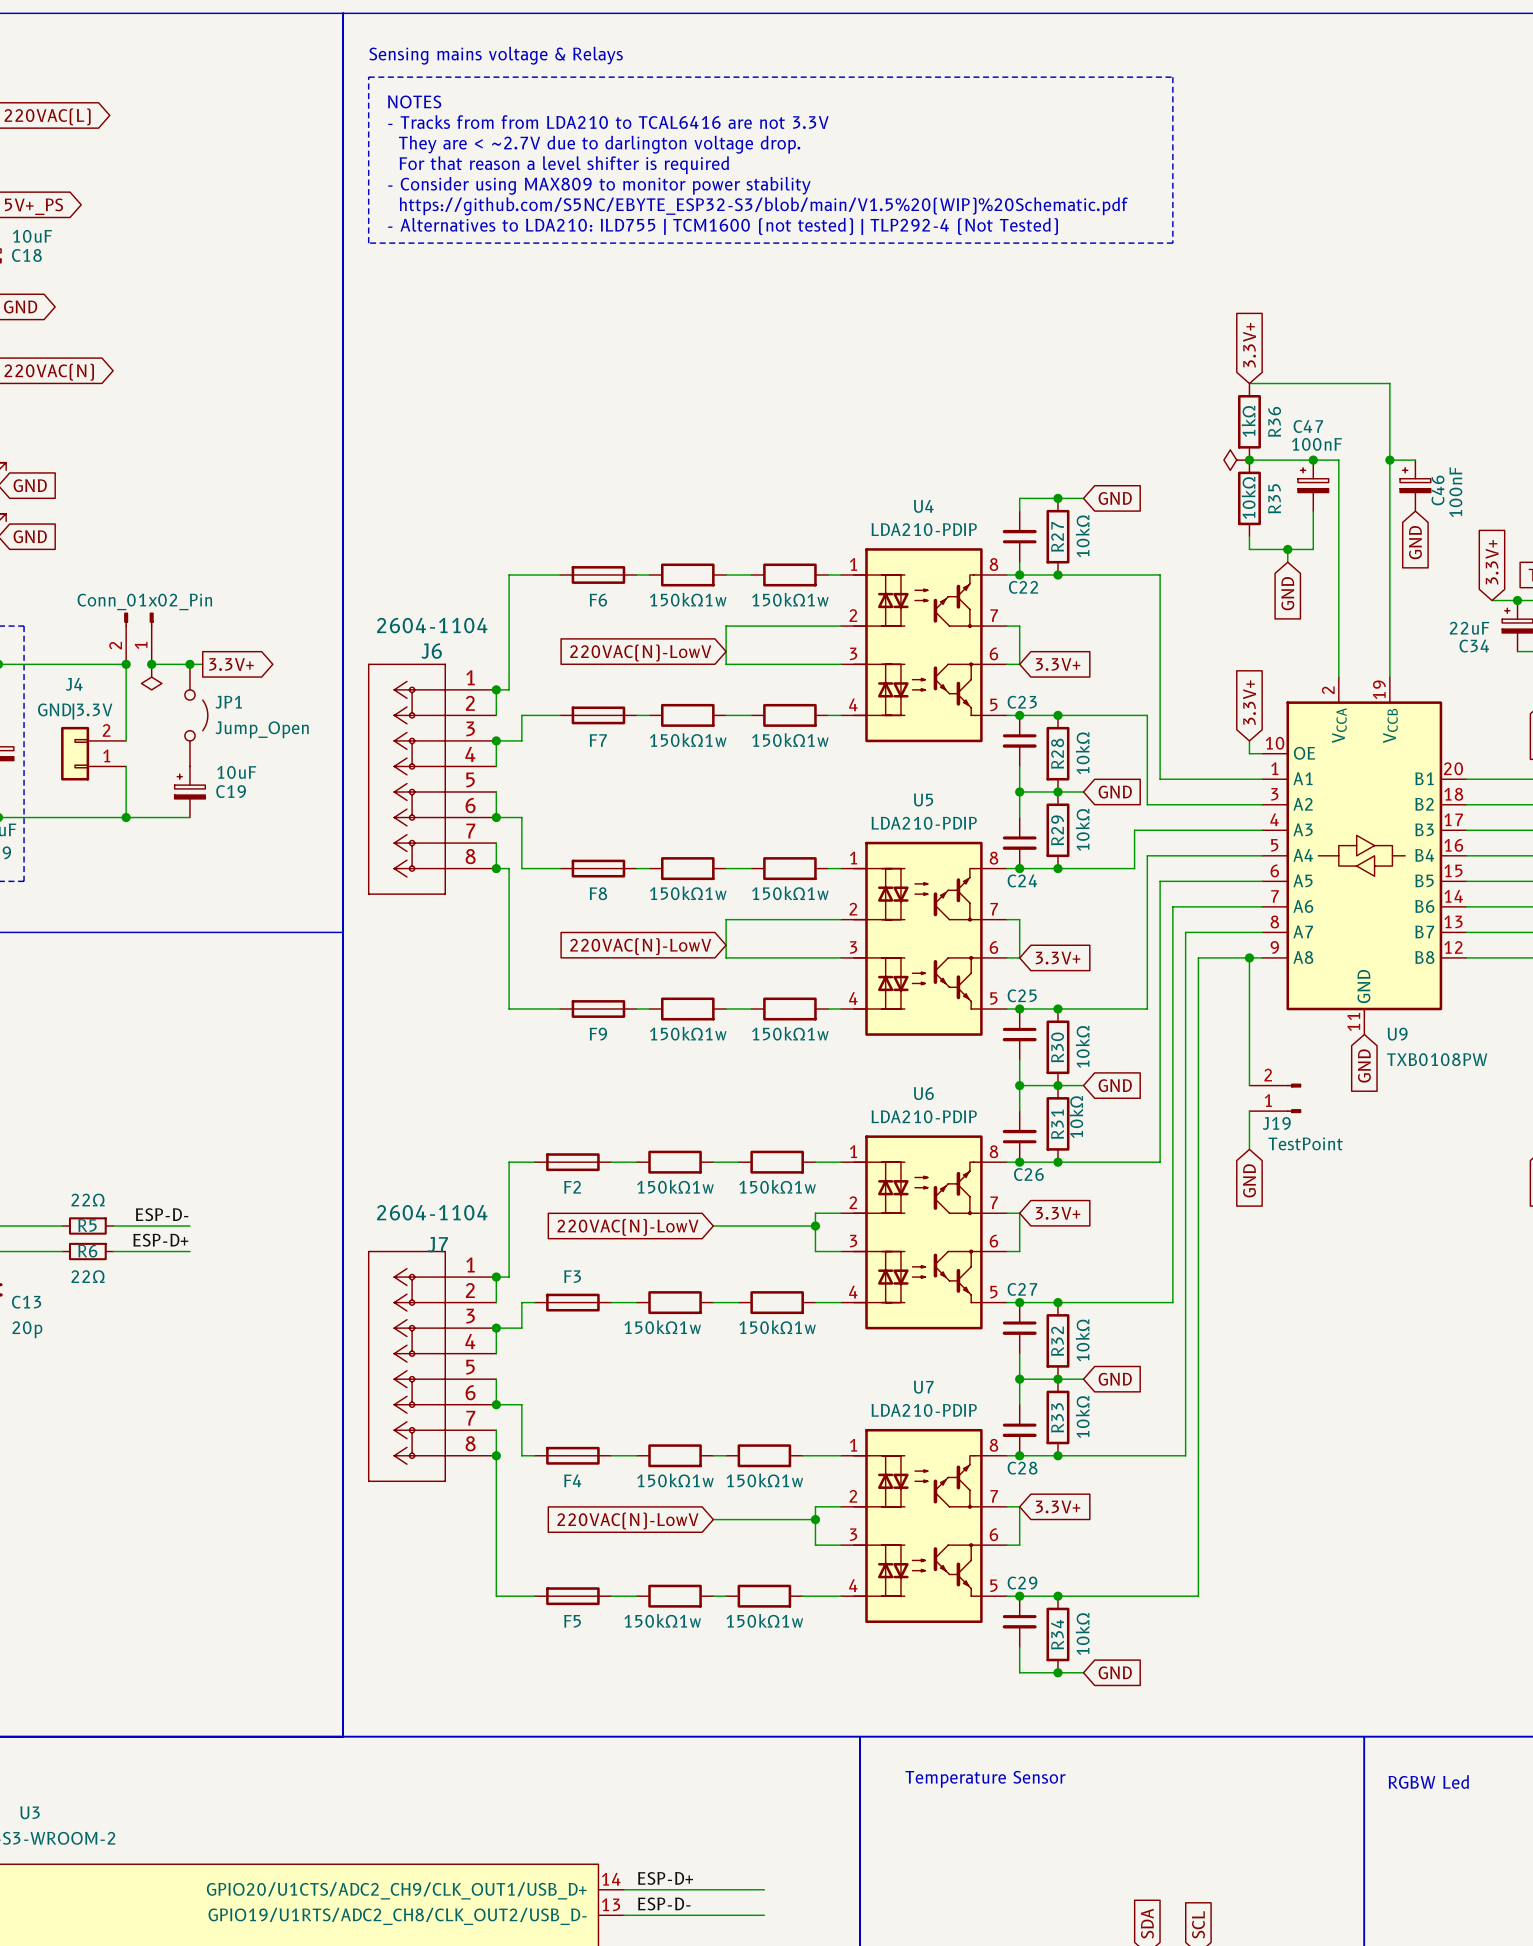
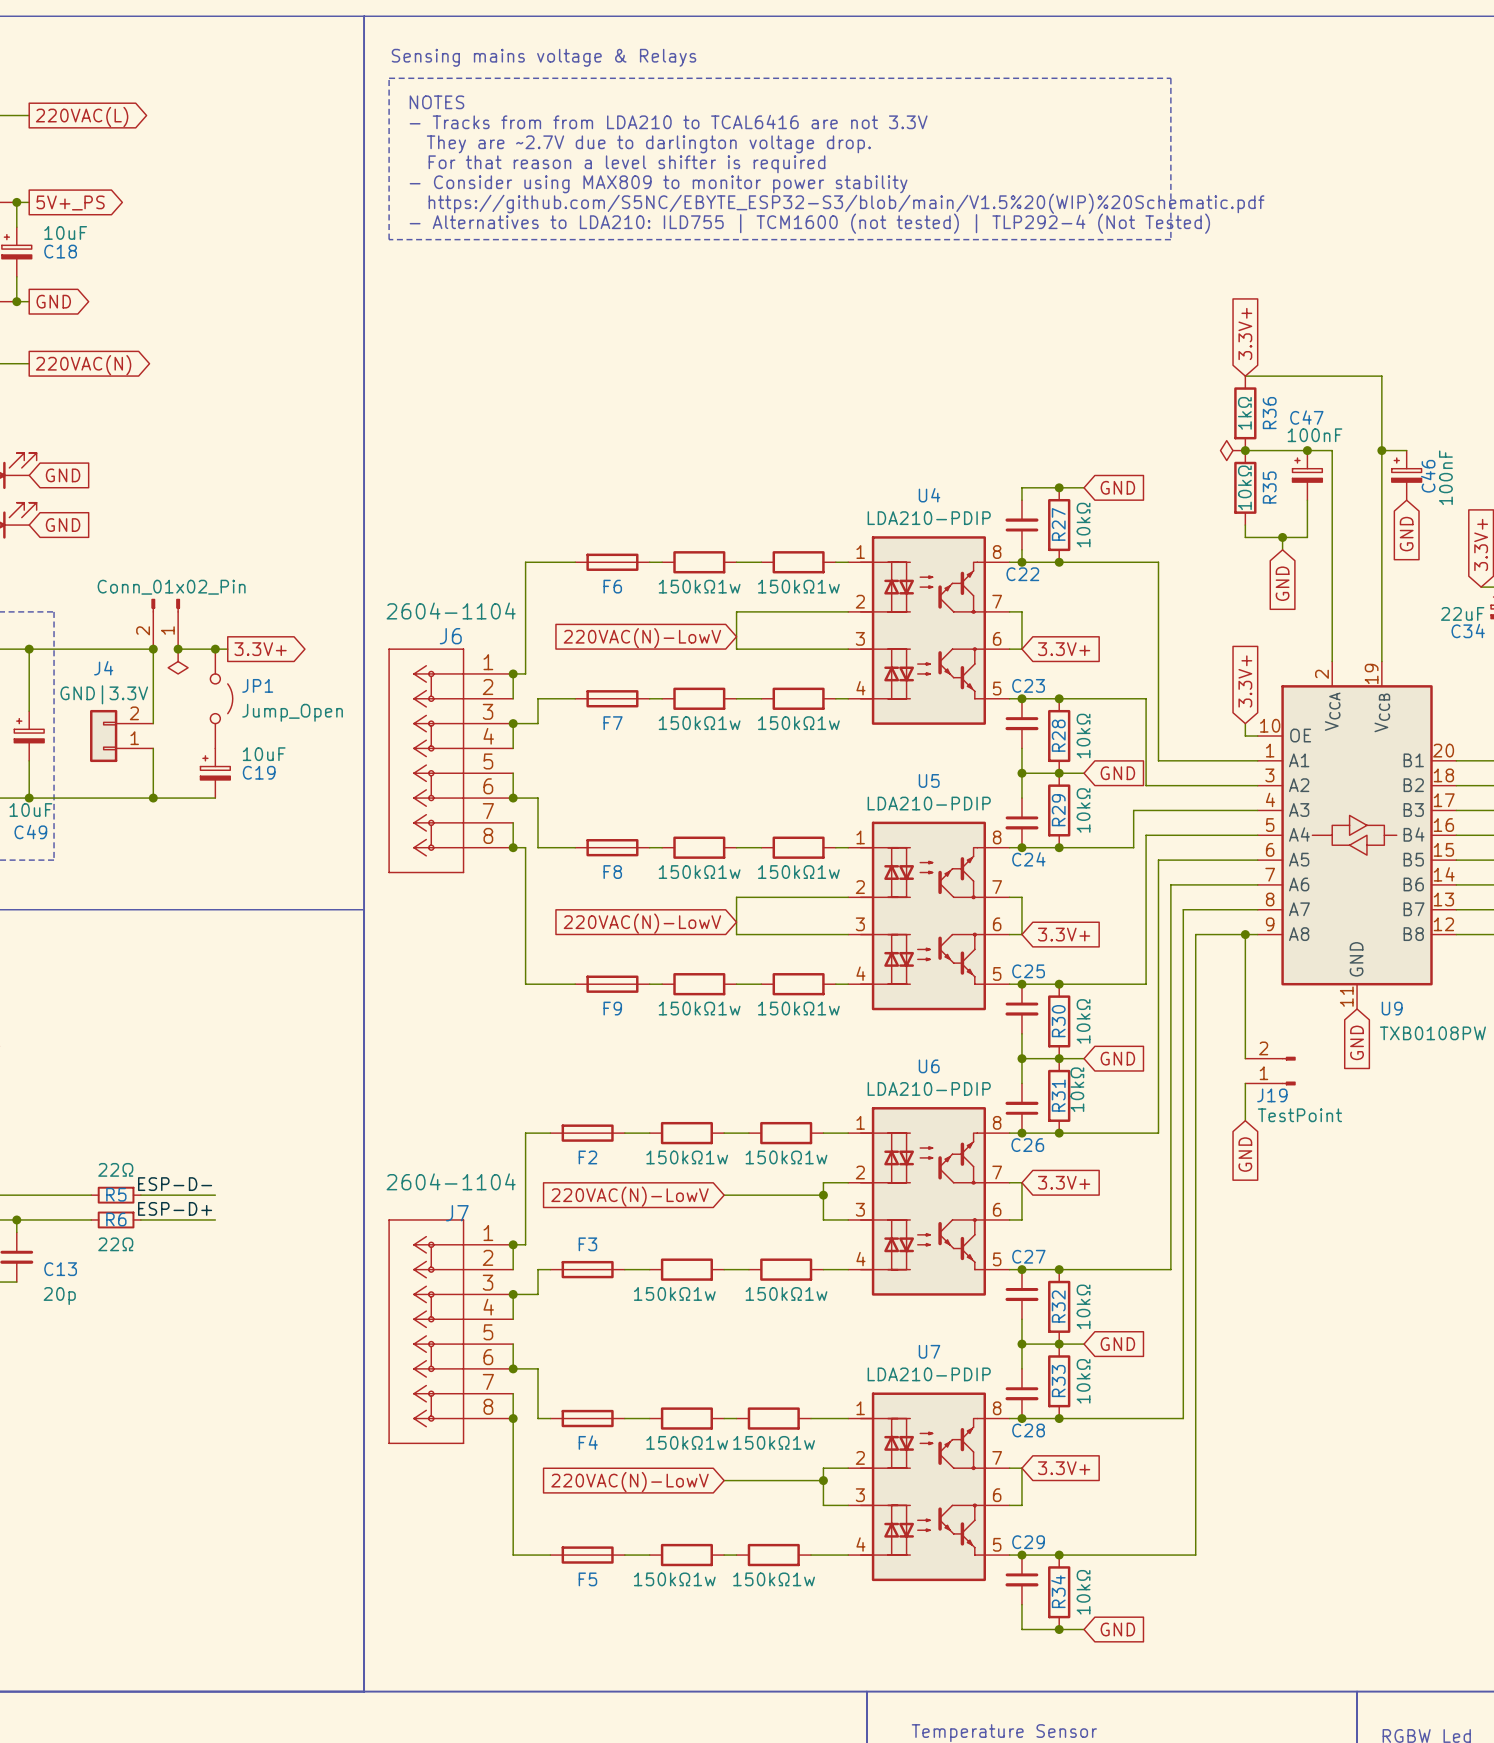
text: They are < ~2.7V due to darlington voltage drop. (599, 144) -> They are ~2.7V due to darlington voltage drop. (648, 144)

